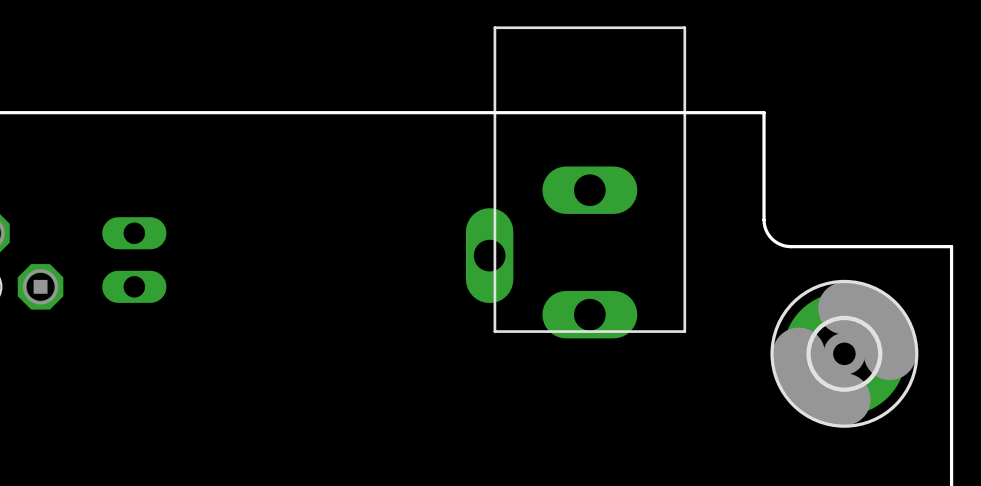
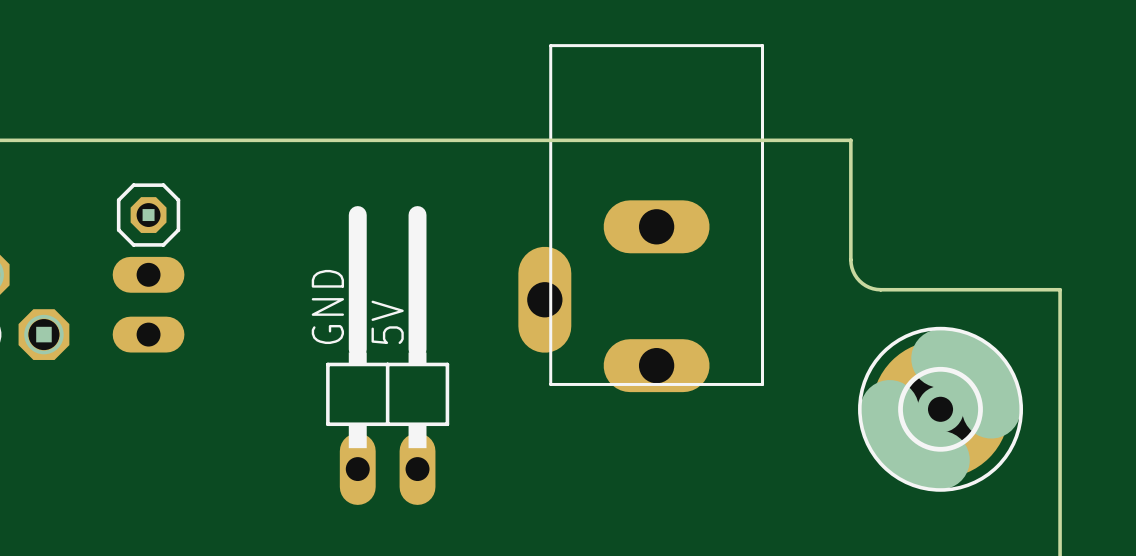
part: none -> (148, 215)
text: none -> GND (327, 306)
text: none -> 5V (387, 322)
part: none -> (387, 355)

